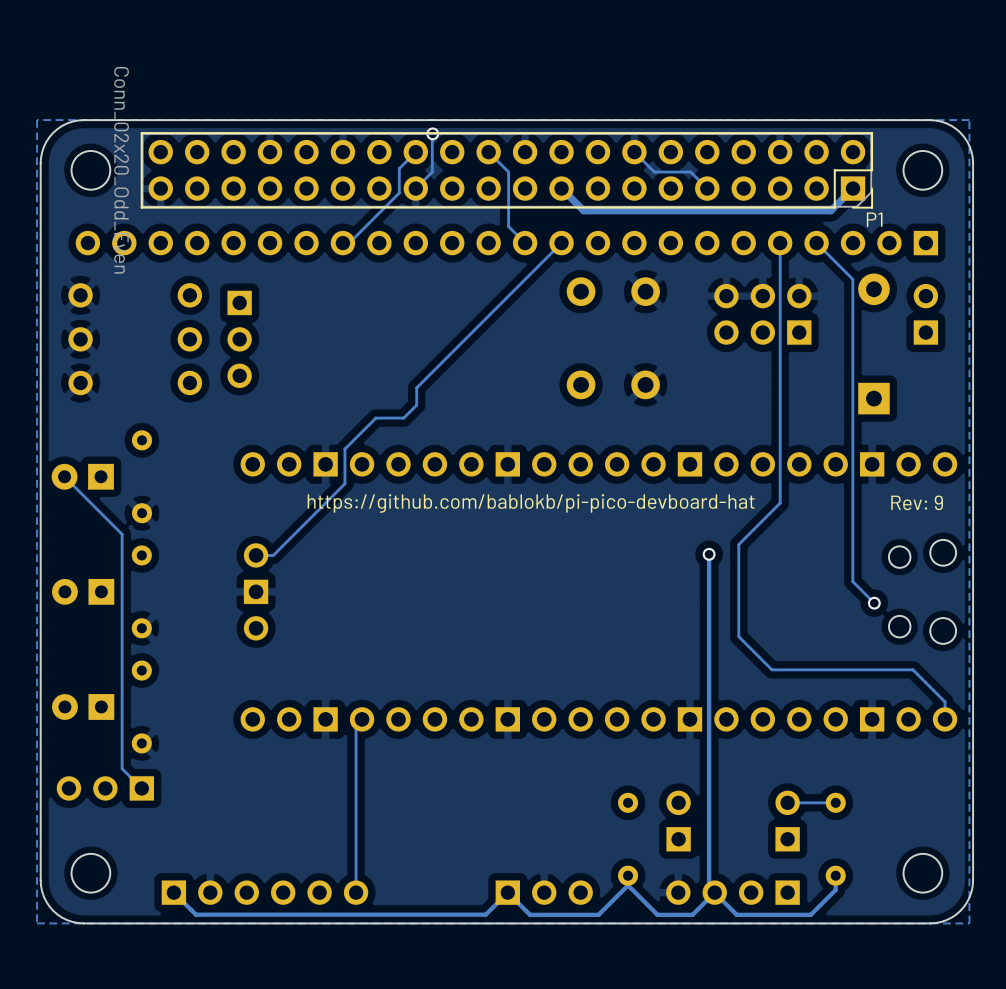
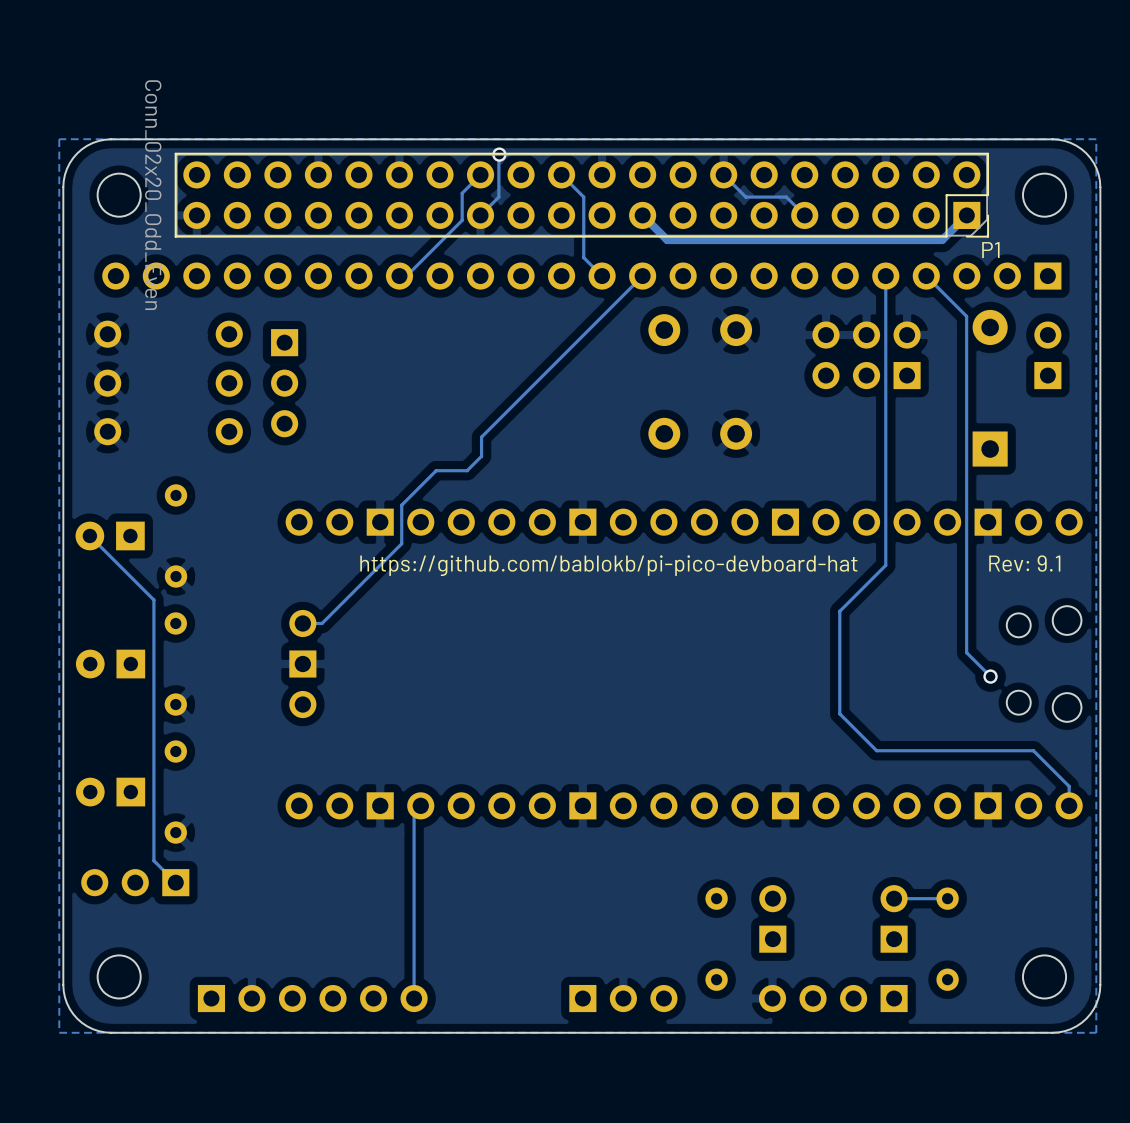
text: Rev: 9 (917, 502) -> Rev: 9.1 (1024, 563)
track: (709, 554) (709, 887) (736, 914) (810, 914) (835, 889) (835, 875) -> none
via: (709, 554) -> none
track: (628, 885) (657, 914) (692, 914) (714, 892) -> none
track: (628, 885) (598, 914) (530, 914) (507, 892) (485, 914) (195, 914) (173, 892) -> none

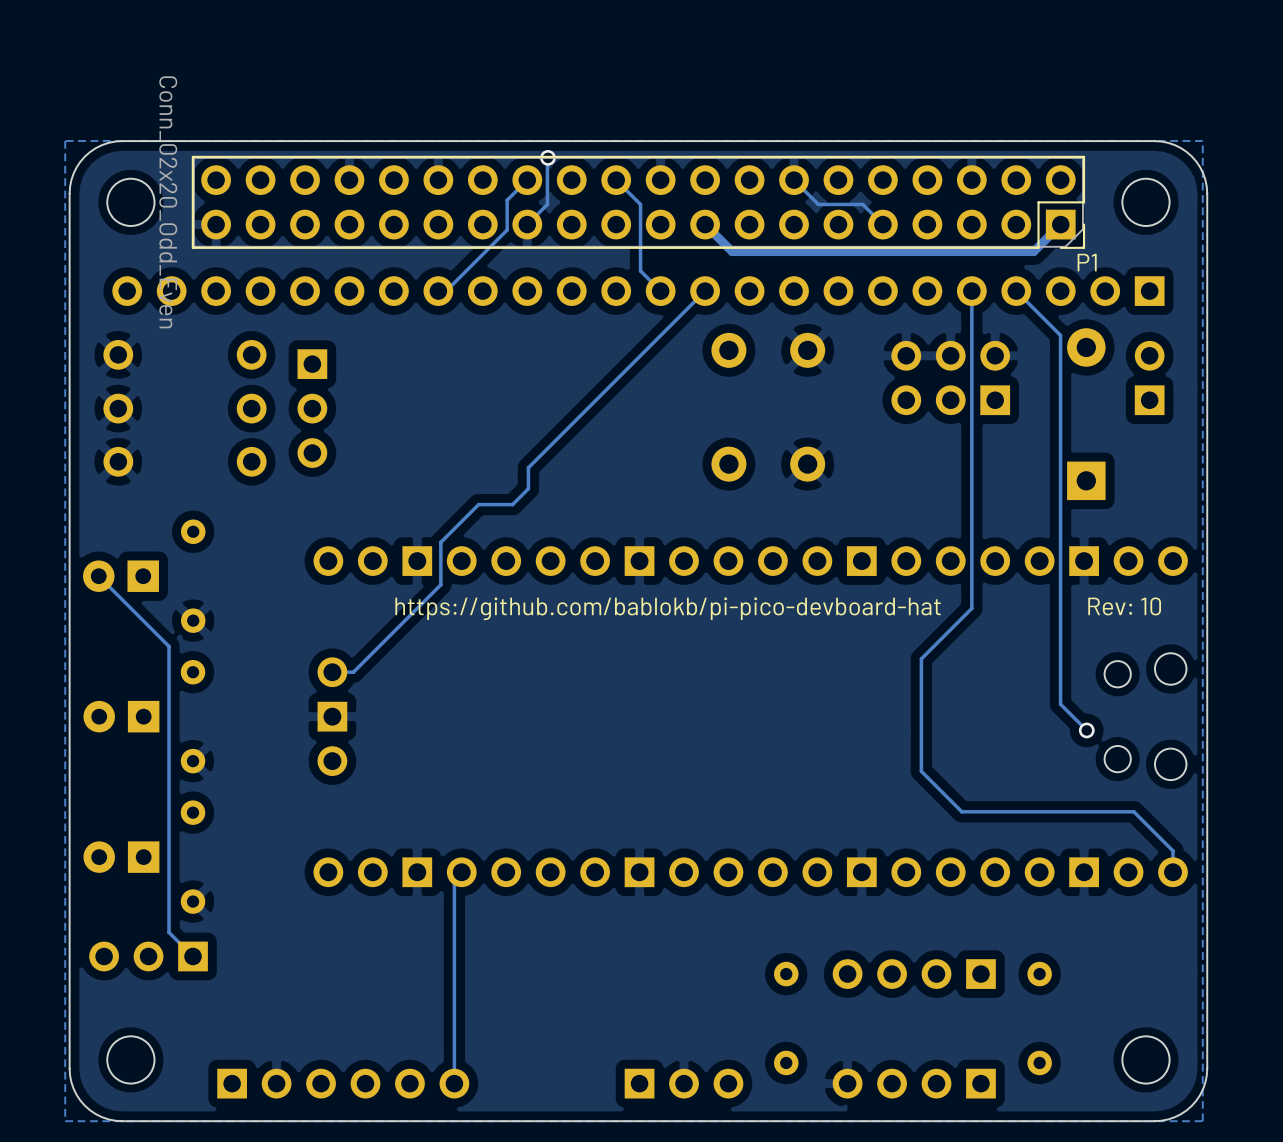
text: Rev: 9.1 (1024, 563) -> Rev: 10 (1124, 606)
part: none -> (914, 974)
track: (947, 898) (894, 898) -> none
part: (772, 918) -> none
part: (894, 918) -> none

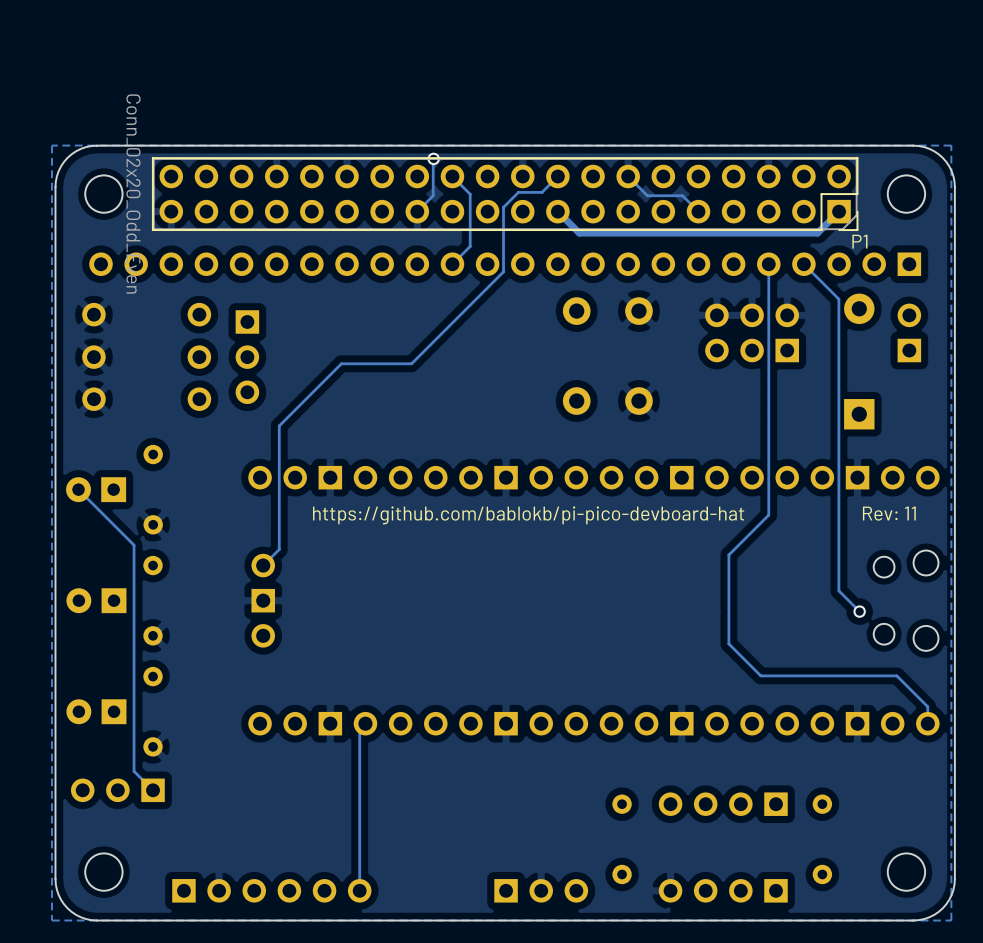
track: (527, 180) (507, 200) (507, 230) (446, 291) (438, 291) -> none
track: none -> (452, 176) (470, 194) (470, 246) (452, 264)
track: (616, 180) (640, 204) (640, 270) (660, 291) -> none
track: (705, 291) (528, 467) (528, 488) (512, 504) (478, 504) (440, 542) (440, 584) (353, 672) (332, 672) -> (557, 176) (541, 192) (518, 192) (503, 207) (503, 271) (411, 363) (341, 363) (279, 425) (279, 549) (263, 565)
text: Rev: 10 (1124, 606) -> Rev: 11 (889, 513)

